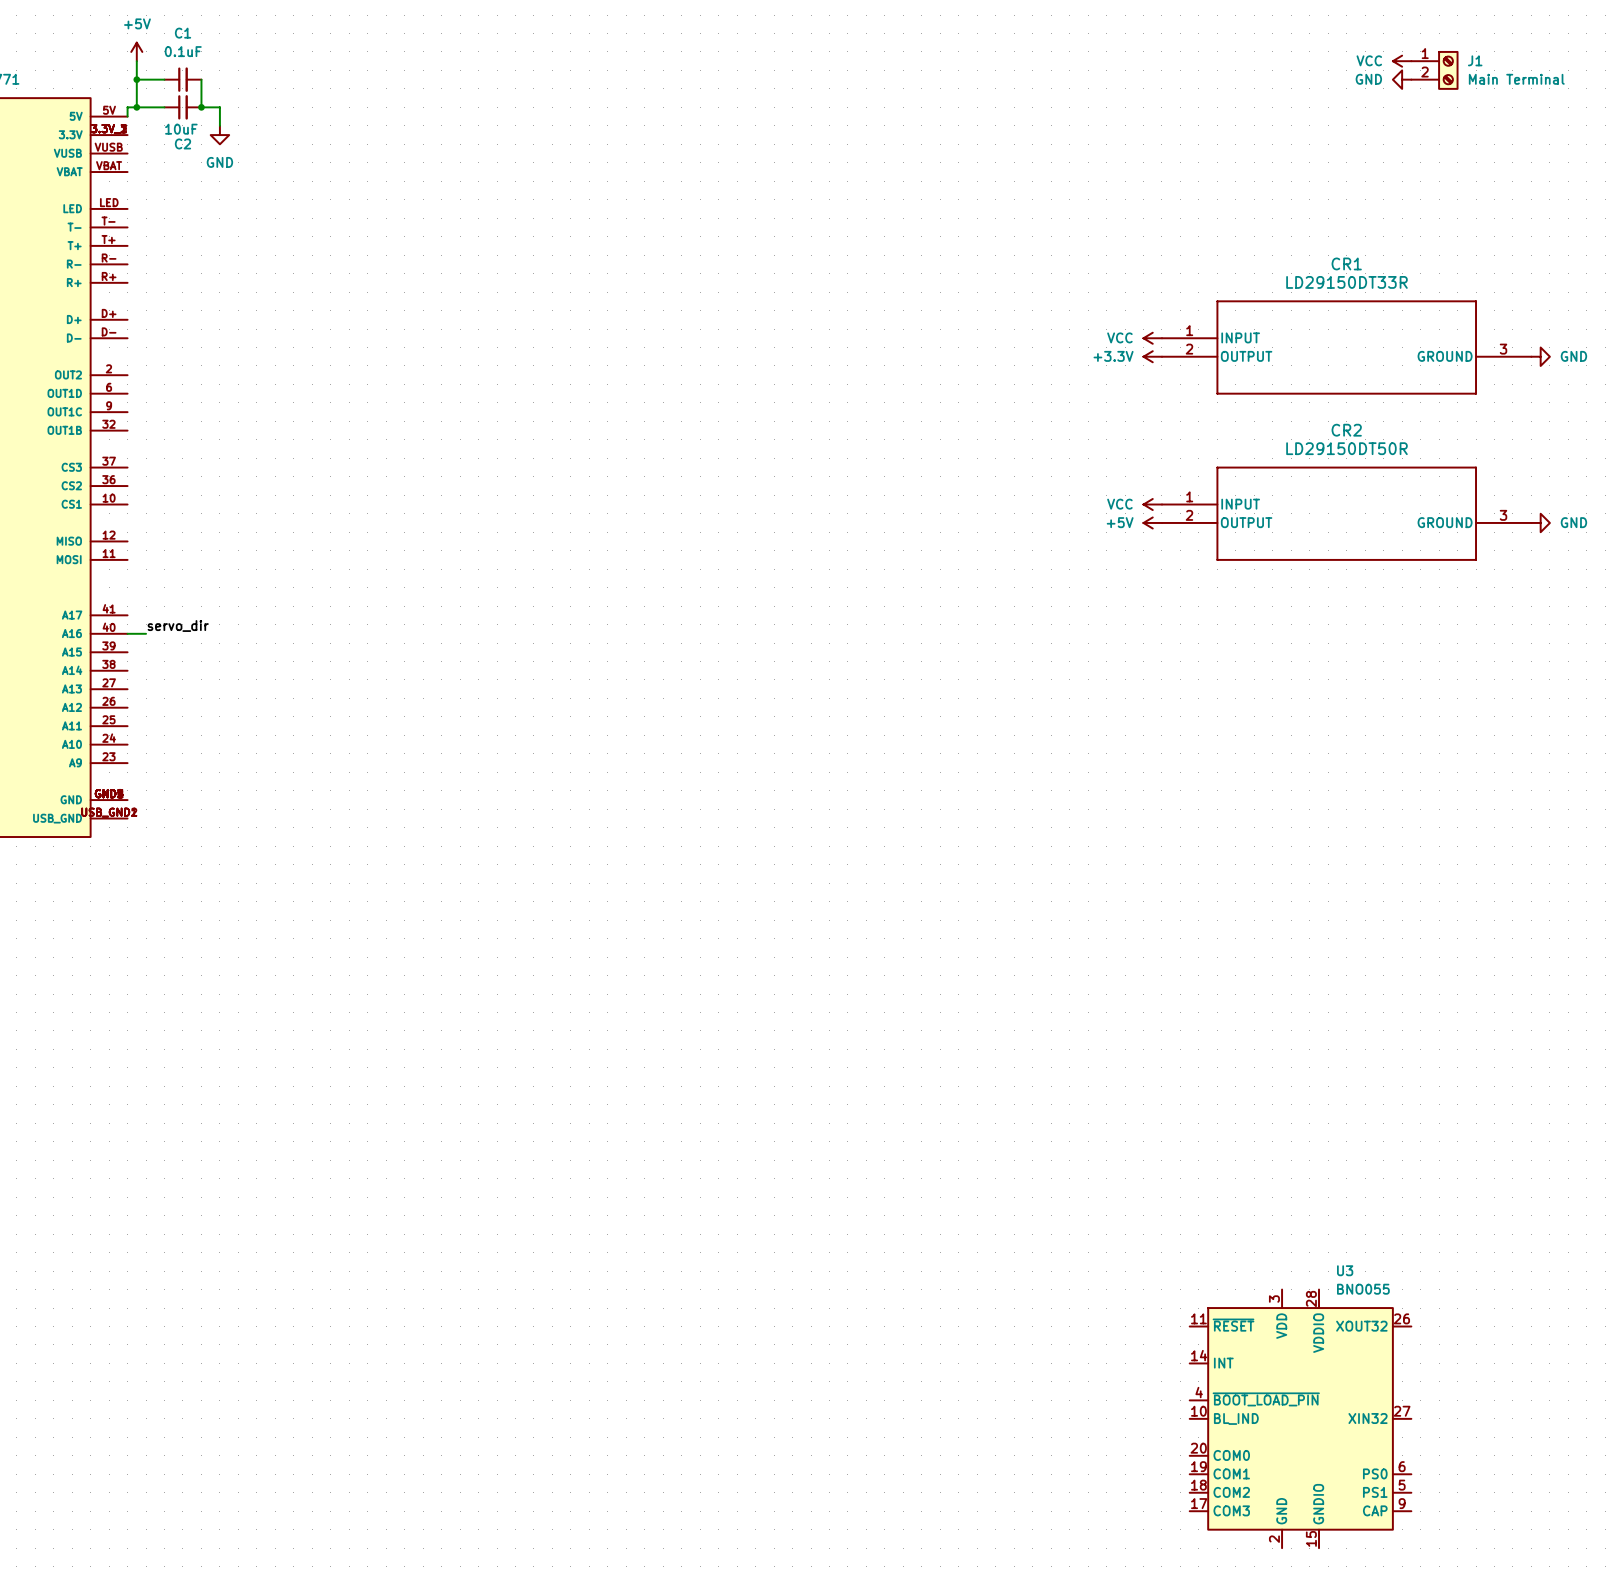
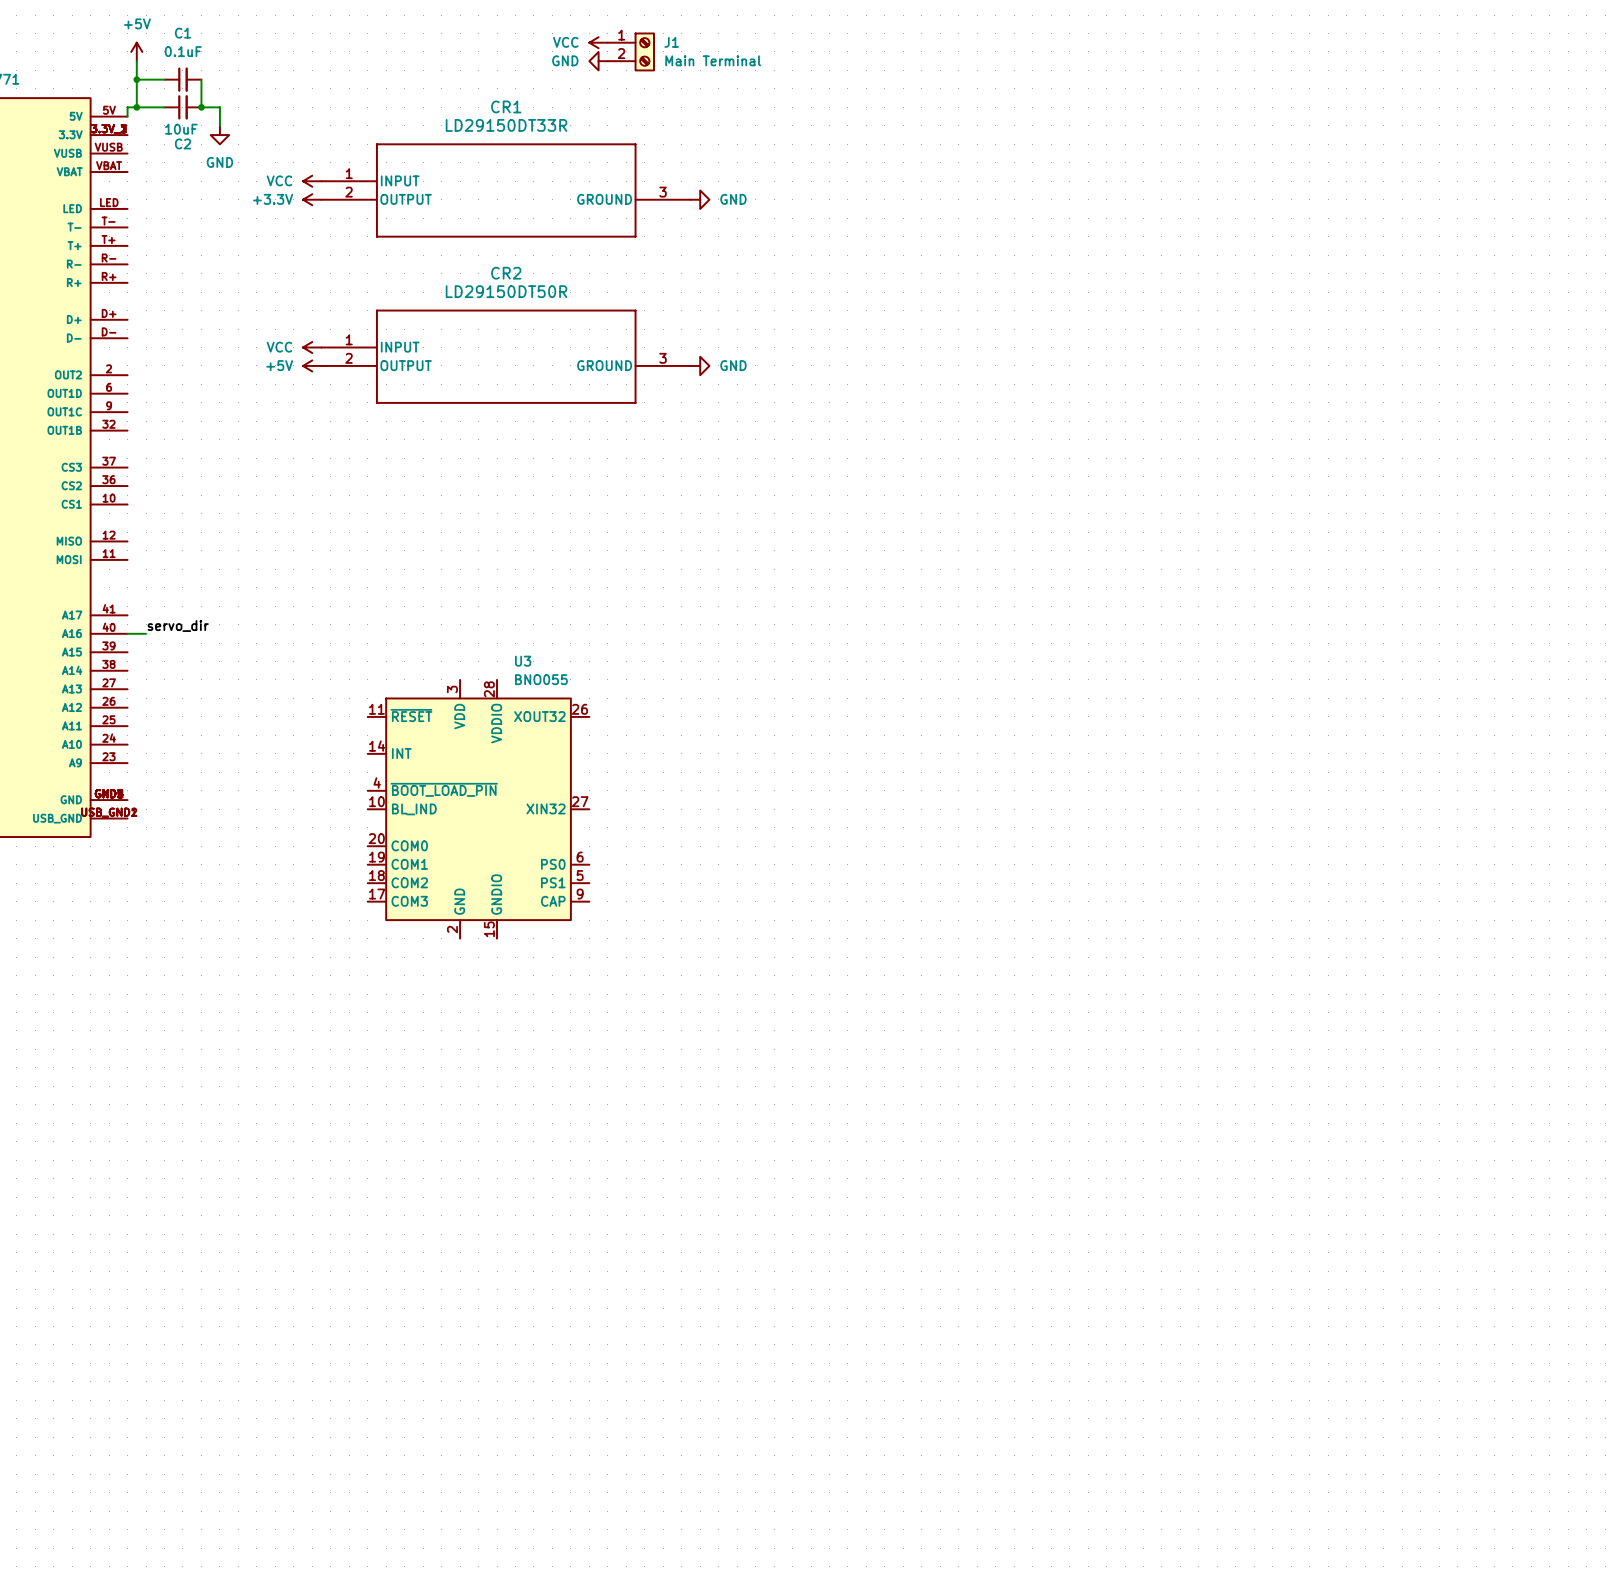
power symbol: none -> VCC (598, 42)
power symbol: none -> GND (598, 61)
power symbol: VCC (1402, 61) -> none
J1 position: (1434, 70) -> (631, 51)
power symbol: GND (1402, 79) -> none
power symbol: none -> VCC (312, 181)
power symbol: none -> +3.3V (312, 199)
power symbol: none -> GND (700, 199)
power symbol: VCC (1152, 338) -> none
power symbol: none -> VCC (312, 347)
CR1 position: (1346, 347) -> (506, 190)
power symbol: +3.3V (1152, 356) -> none
power symbol: GND (1540, 356) -> none
power symbol: none -> +5V (312, 365)
power symbol: none -> GND (700, 365)
power symbol: VCC (1152, 504) -> none
CR2 position: (1346, 513) -> (506, 356)
power symbol: +5V (1152, 522) -> none
power symbol: GND (1540, 522) -> none
U3 position: (1300, 1418) -> (478, 809)

